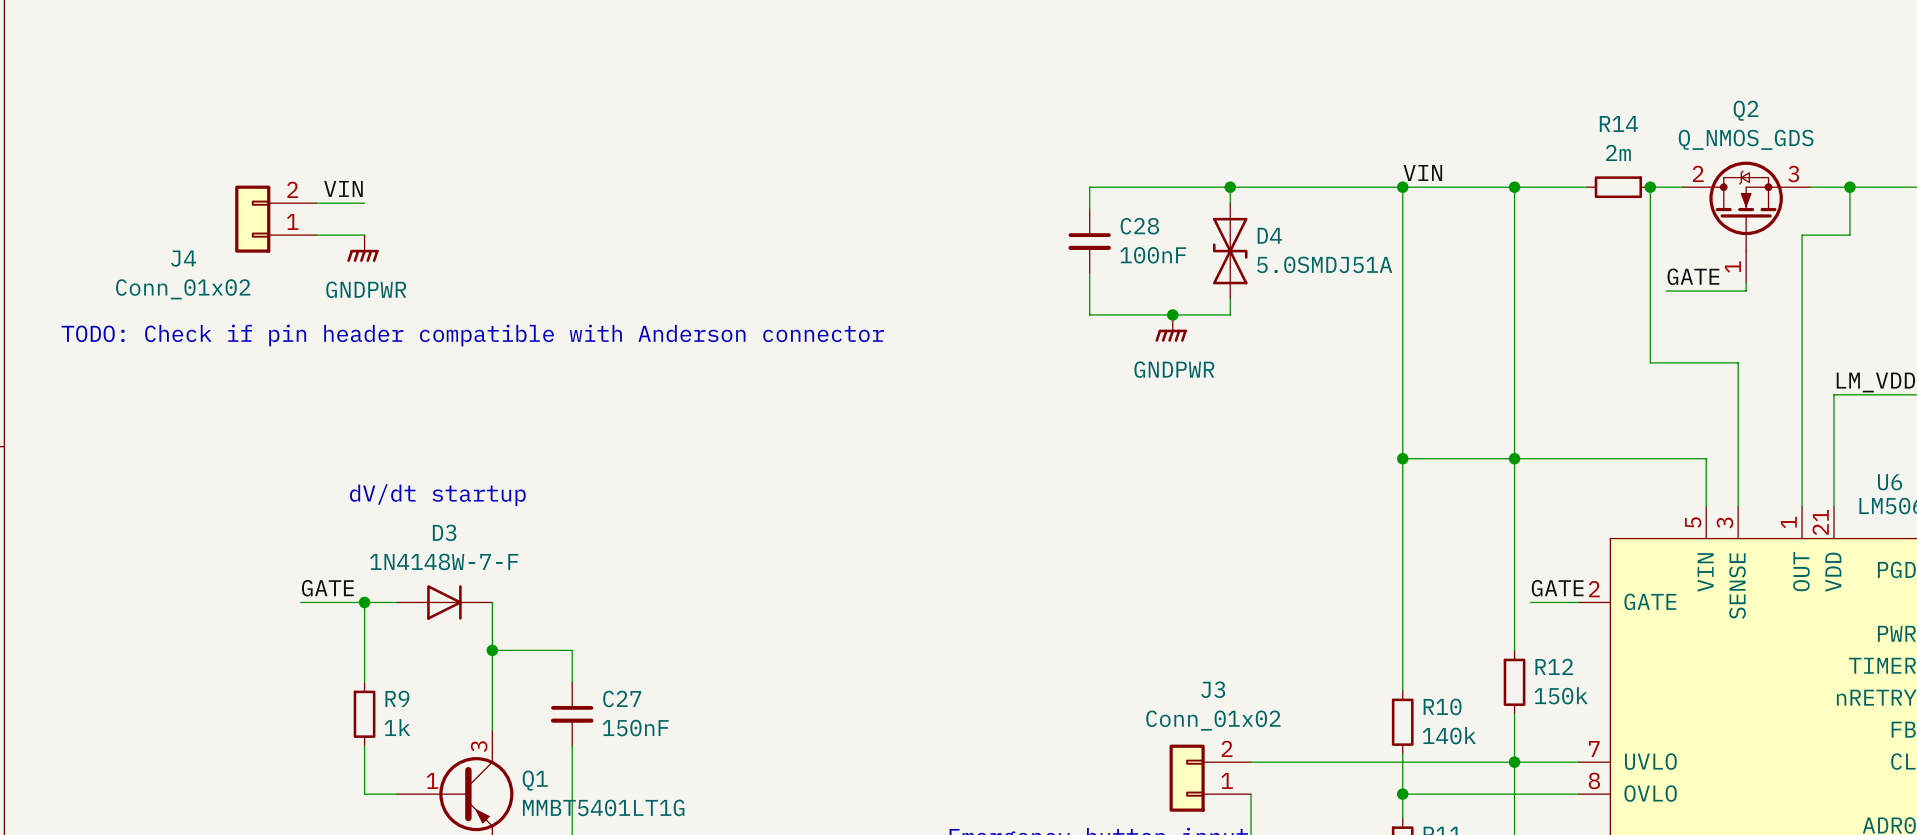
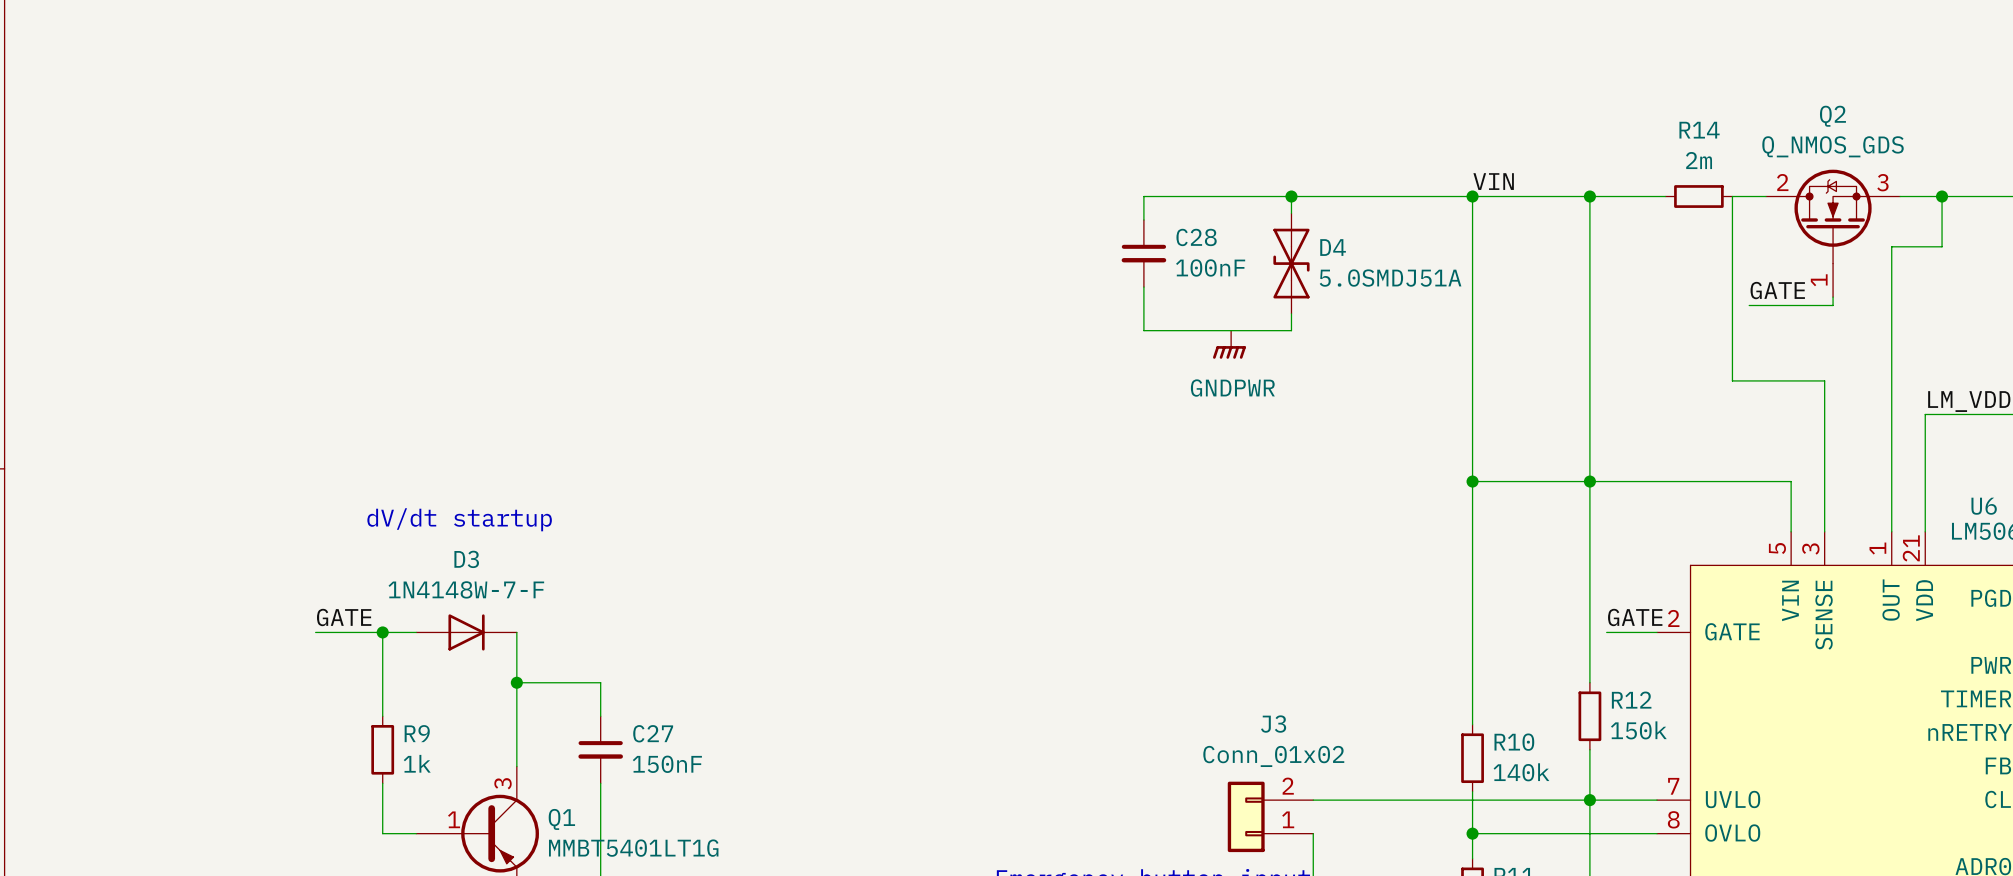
junction: (1650, 187) -> none
label: VIN (343, 188) -> none
wire: (316, 203) (364, 203) -> none
J4: Conn_01x02 (275, 219) -> none
wire: (316, 235) (364, 235) -> none
power symbol: GNDPWR (362, 248) -> none
junction: (1172, 314) -> none
text: TODO: Check if pin header compatible with Anderson connector (472, 335) -> none

